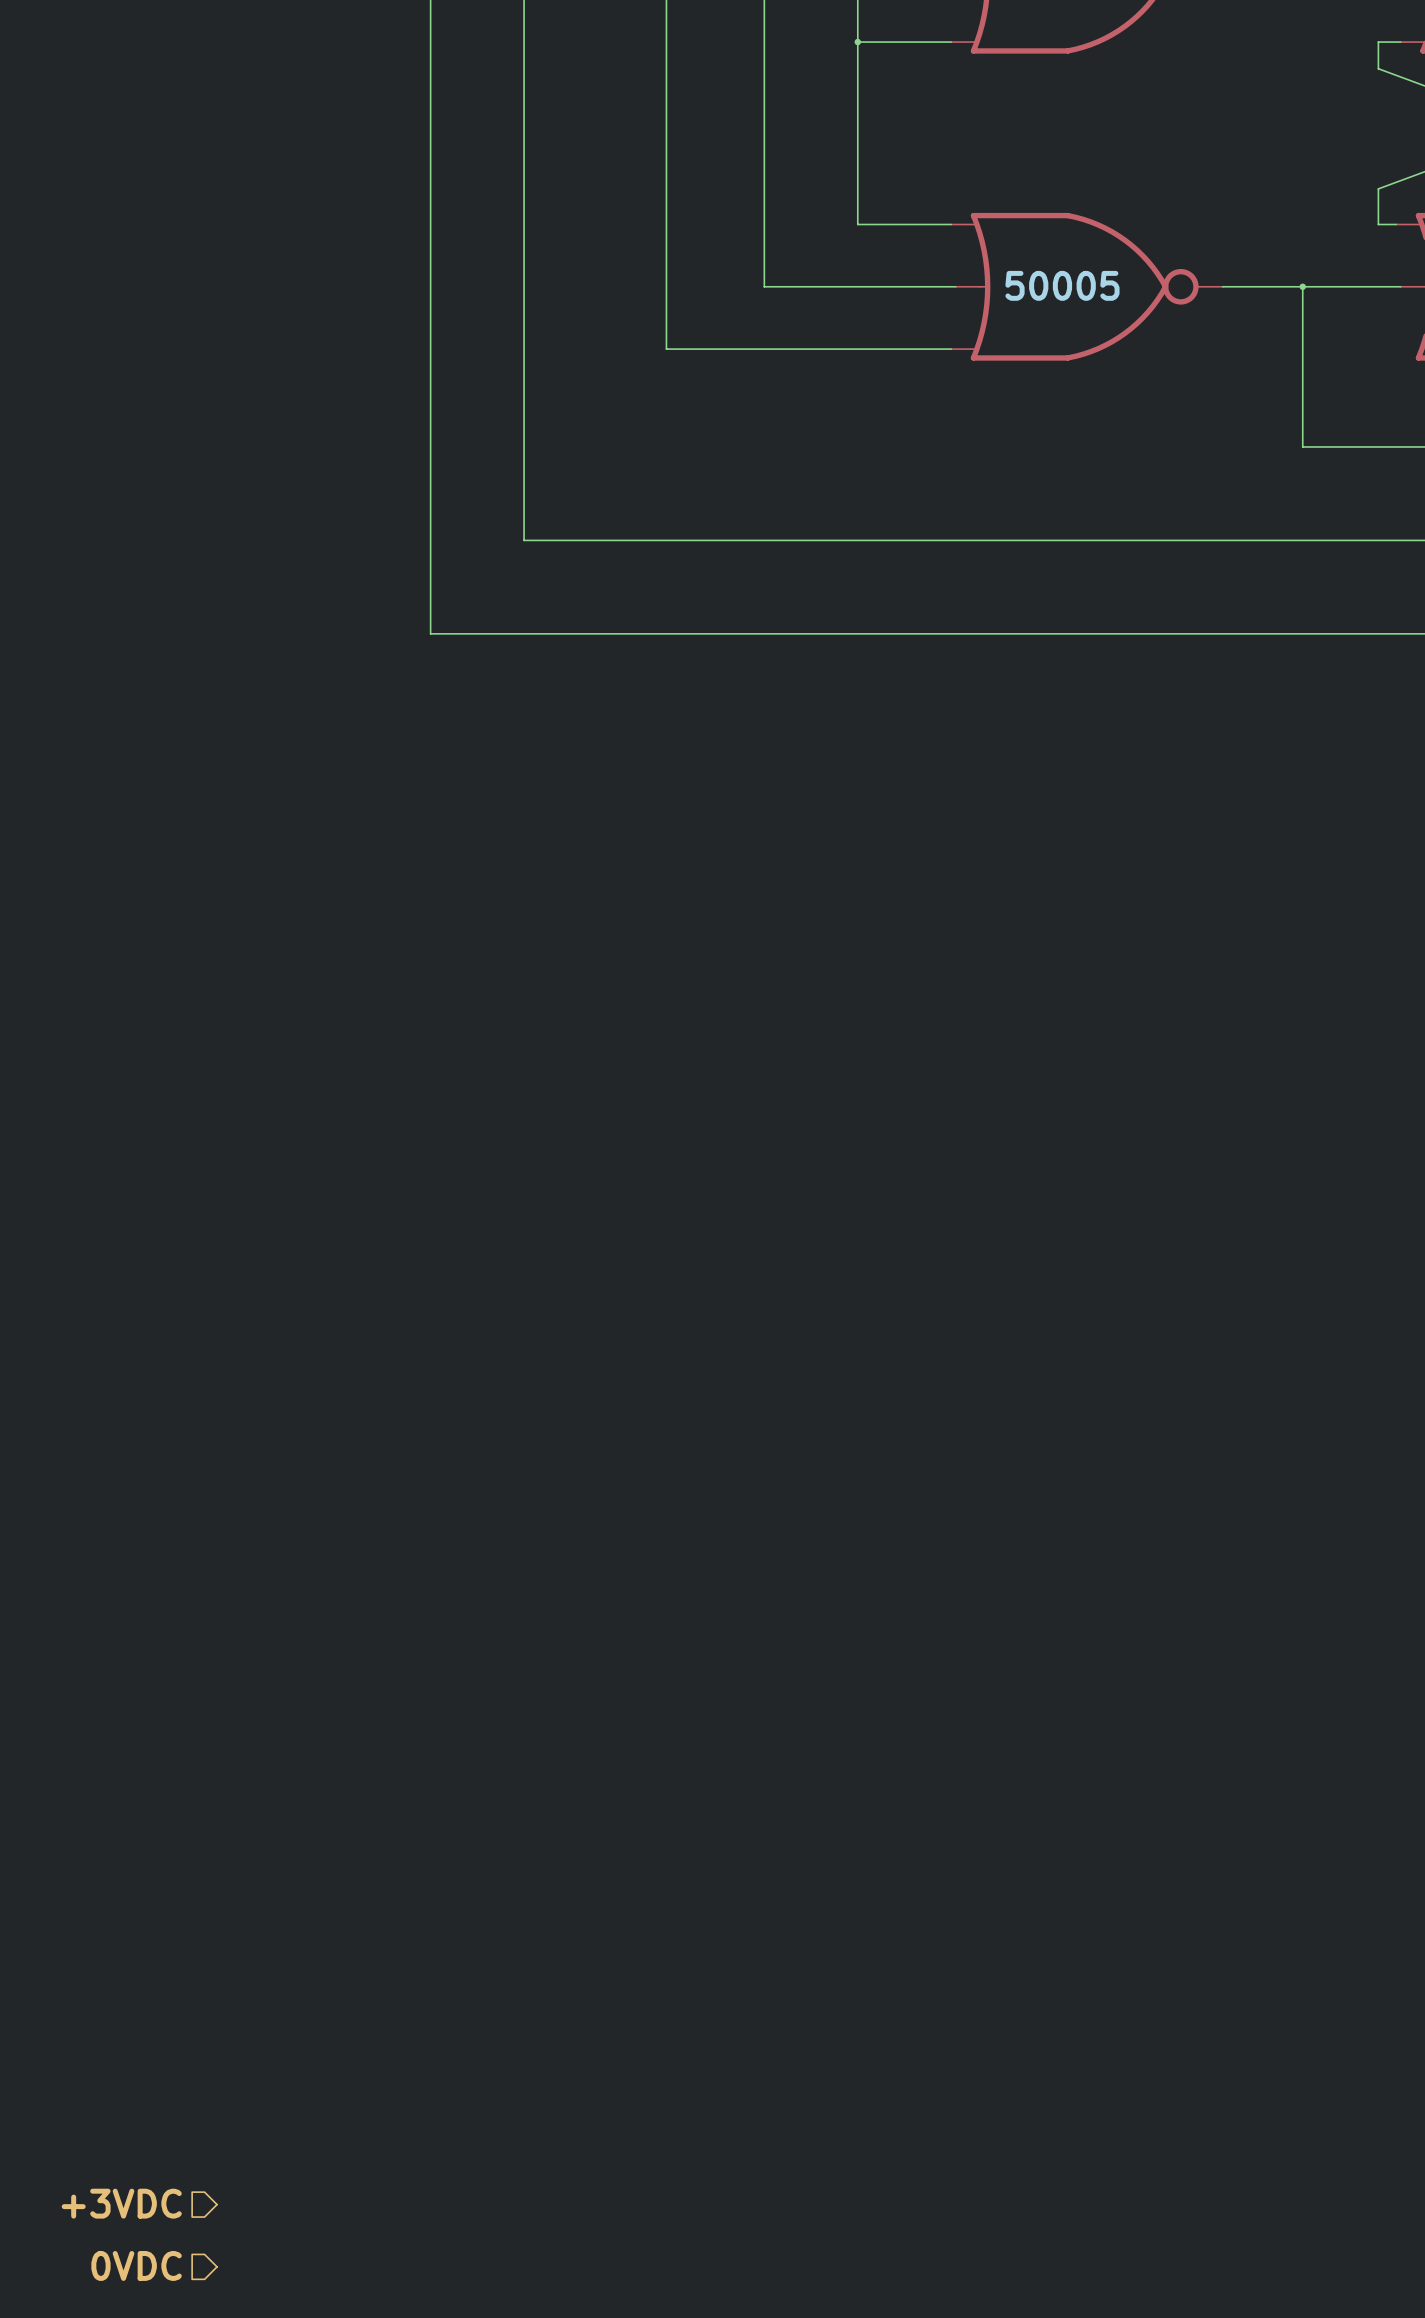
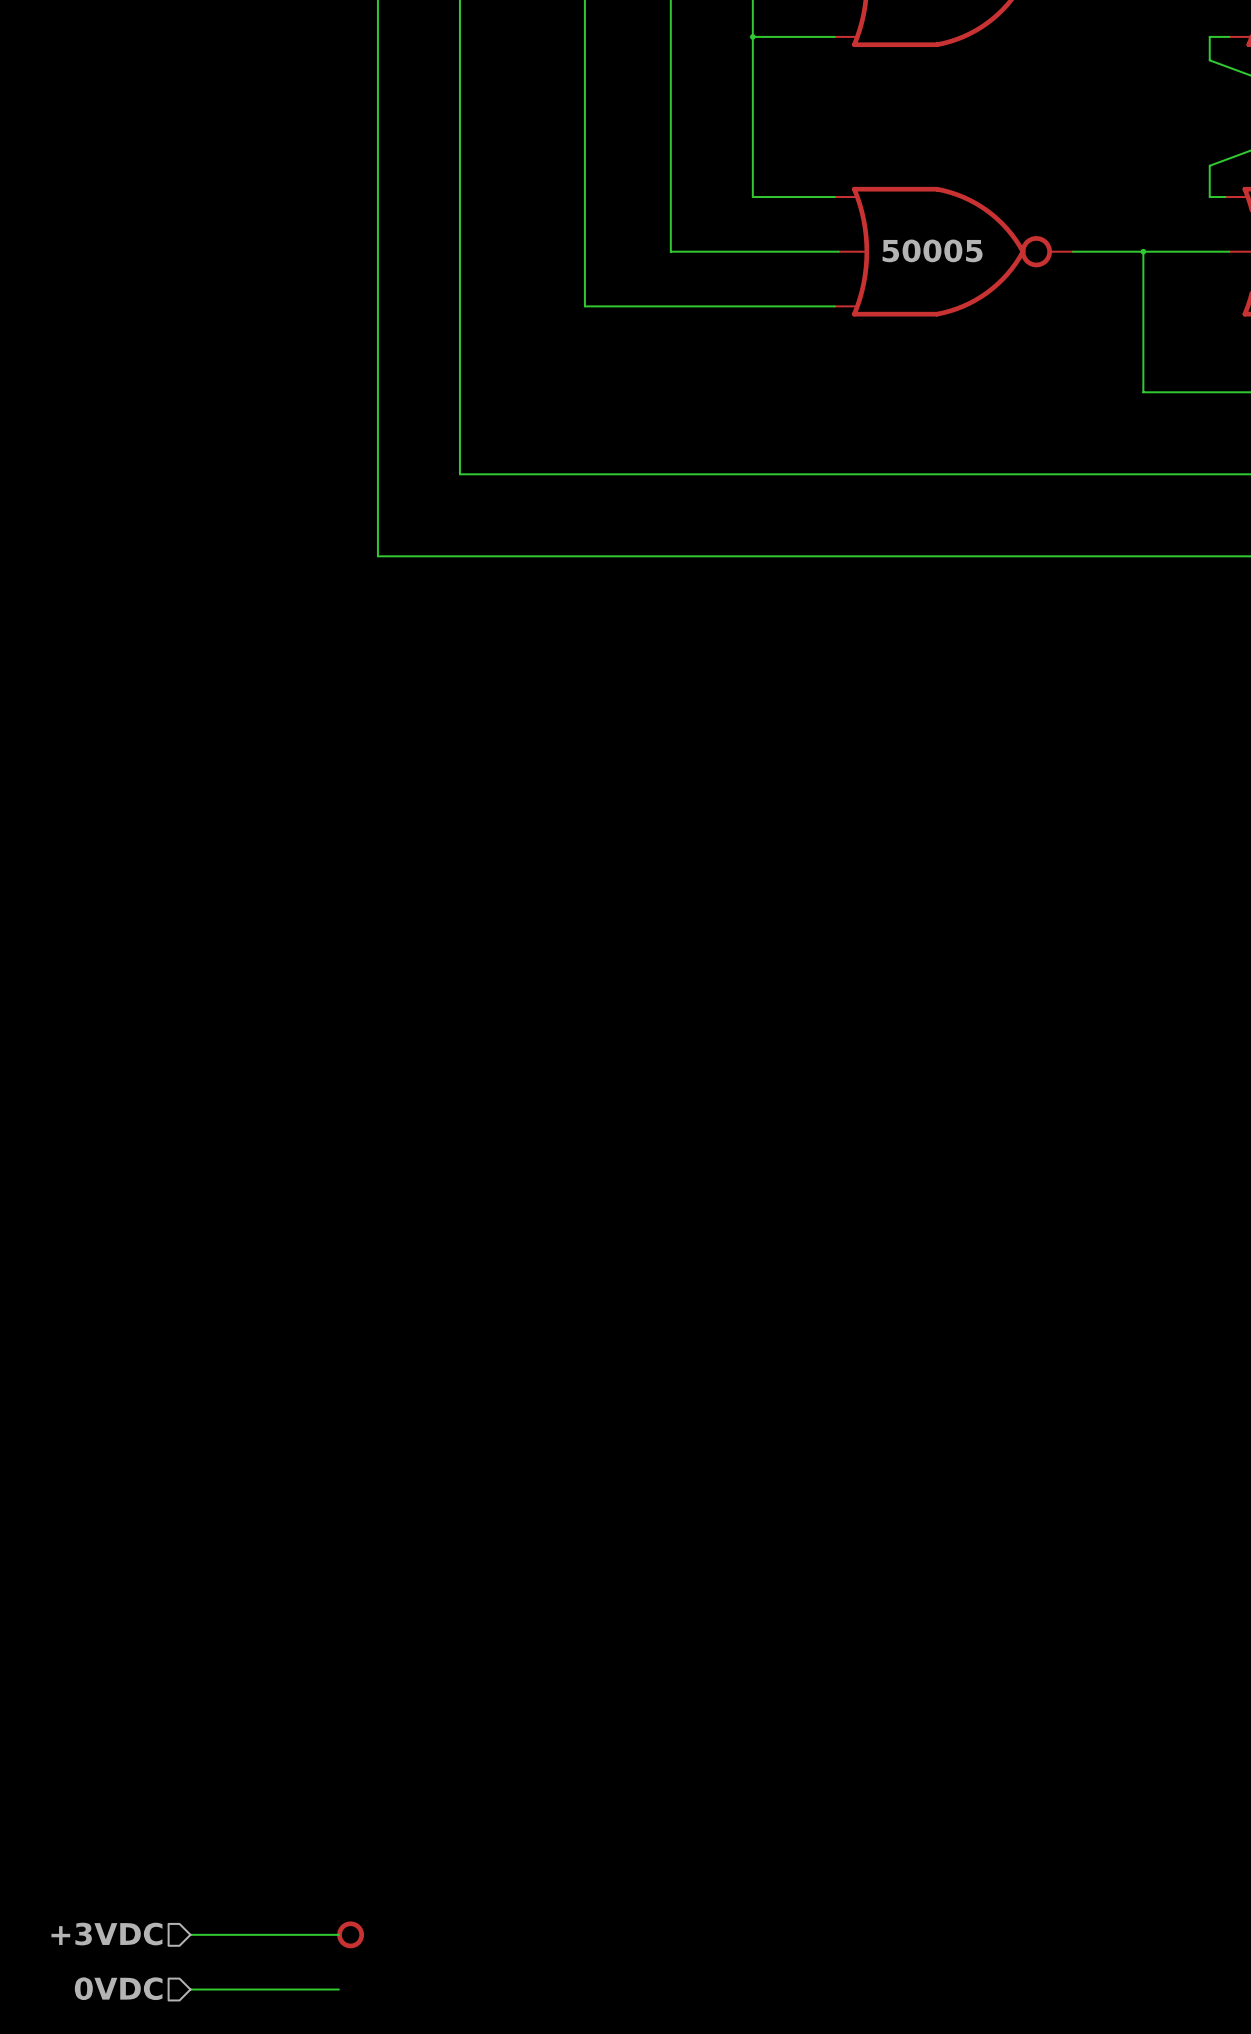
wire: none -> (190, 1934) (338, 1934)
part: none -> (350, 1934)
wire: none -> (190, 1989) (338, 1989)

